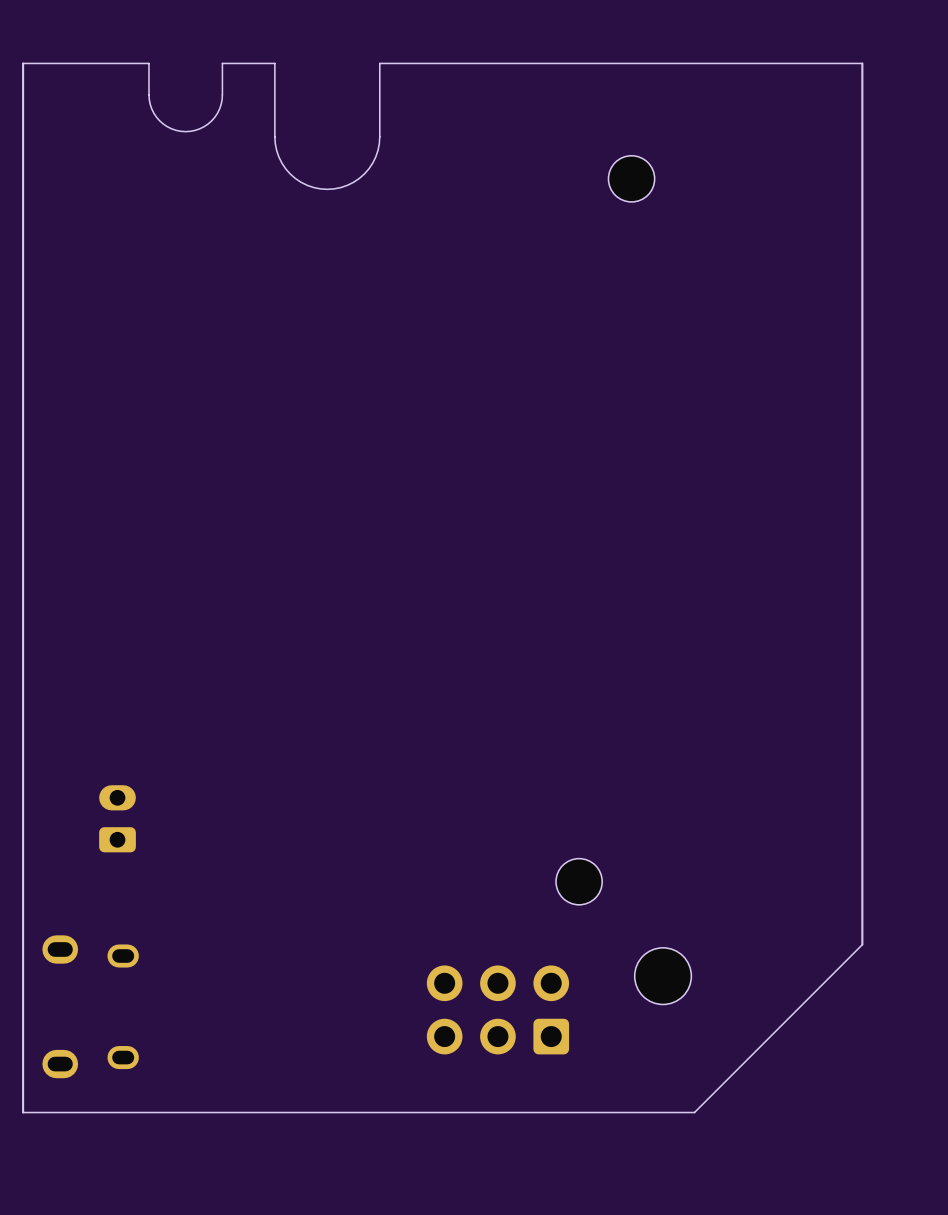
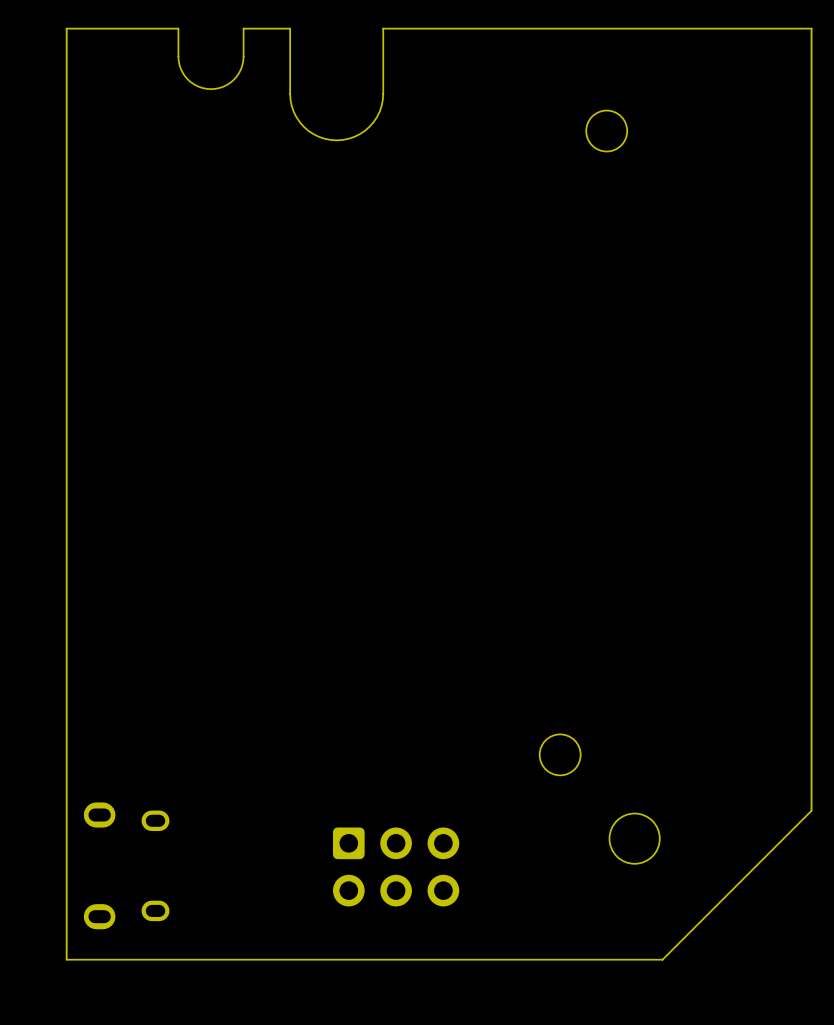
part: (117, 818) -> none
part rotation: 0° (497, 1009) -> 180° (396, 866)
part position: (497, 1009) -> (396, 866)

